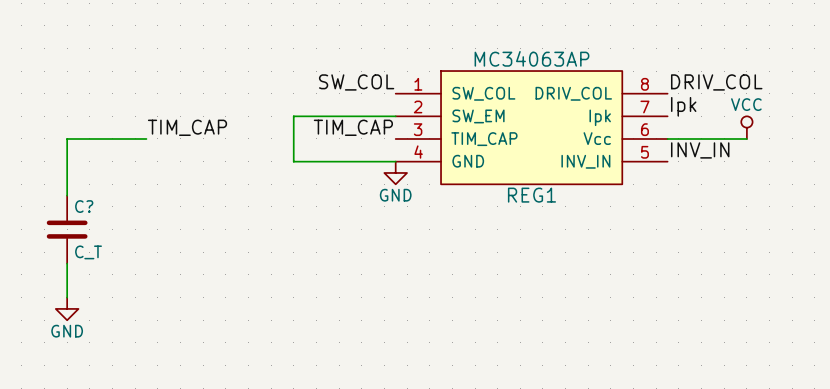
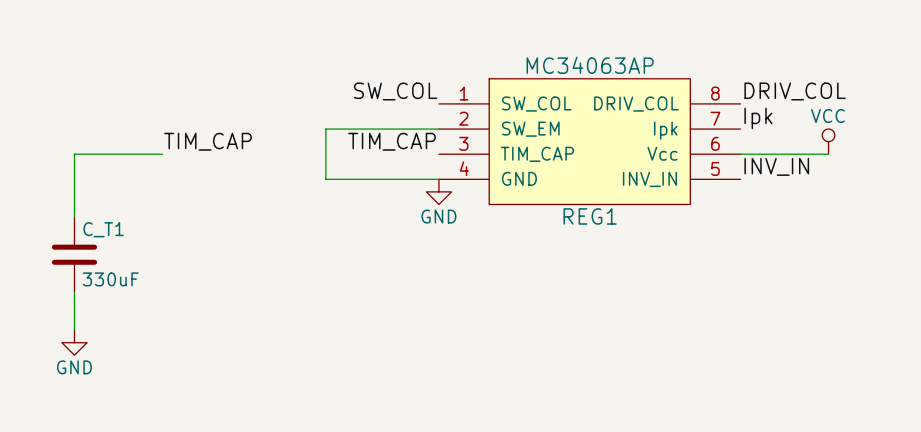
C? name: C? (84, 206) -> C_T1 (103, 229)
C? value: C_T (88, 252) -> 330uF (110, 279)

